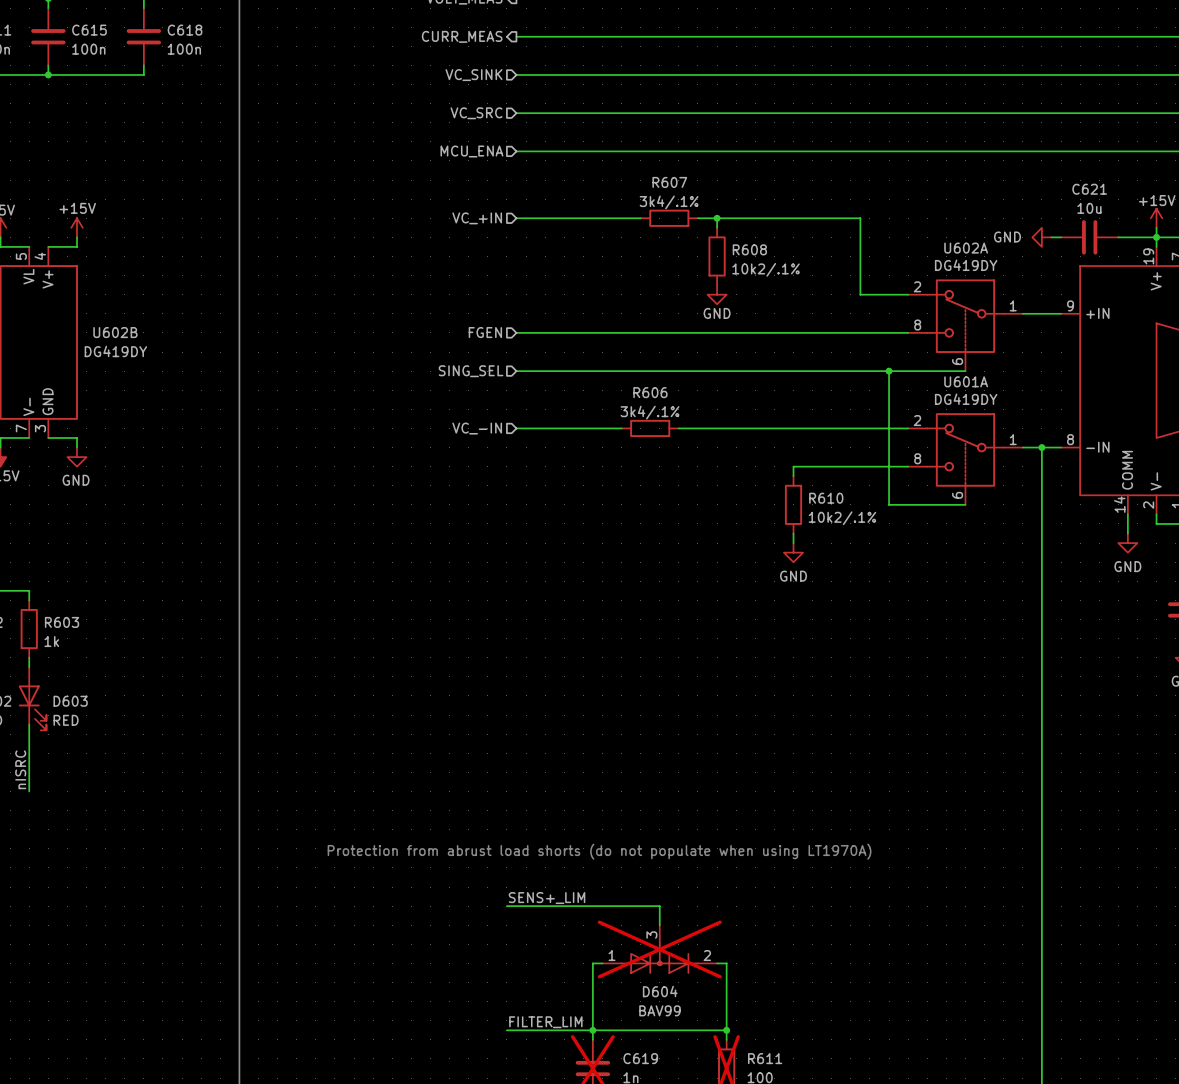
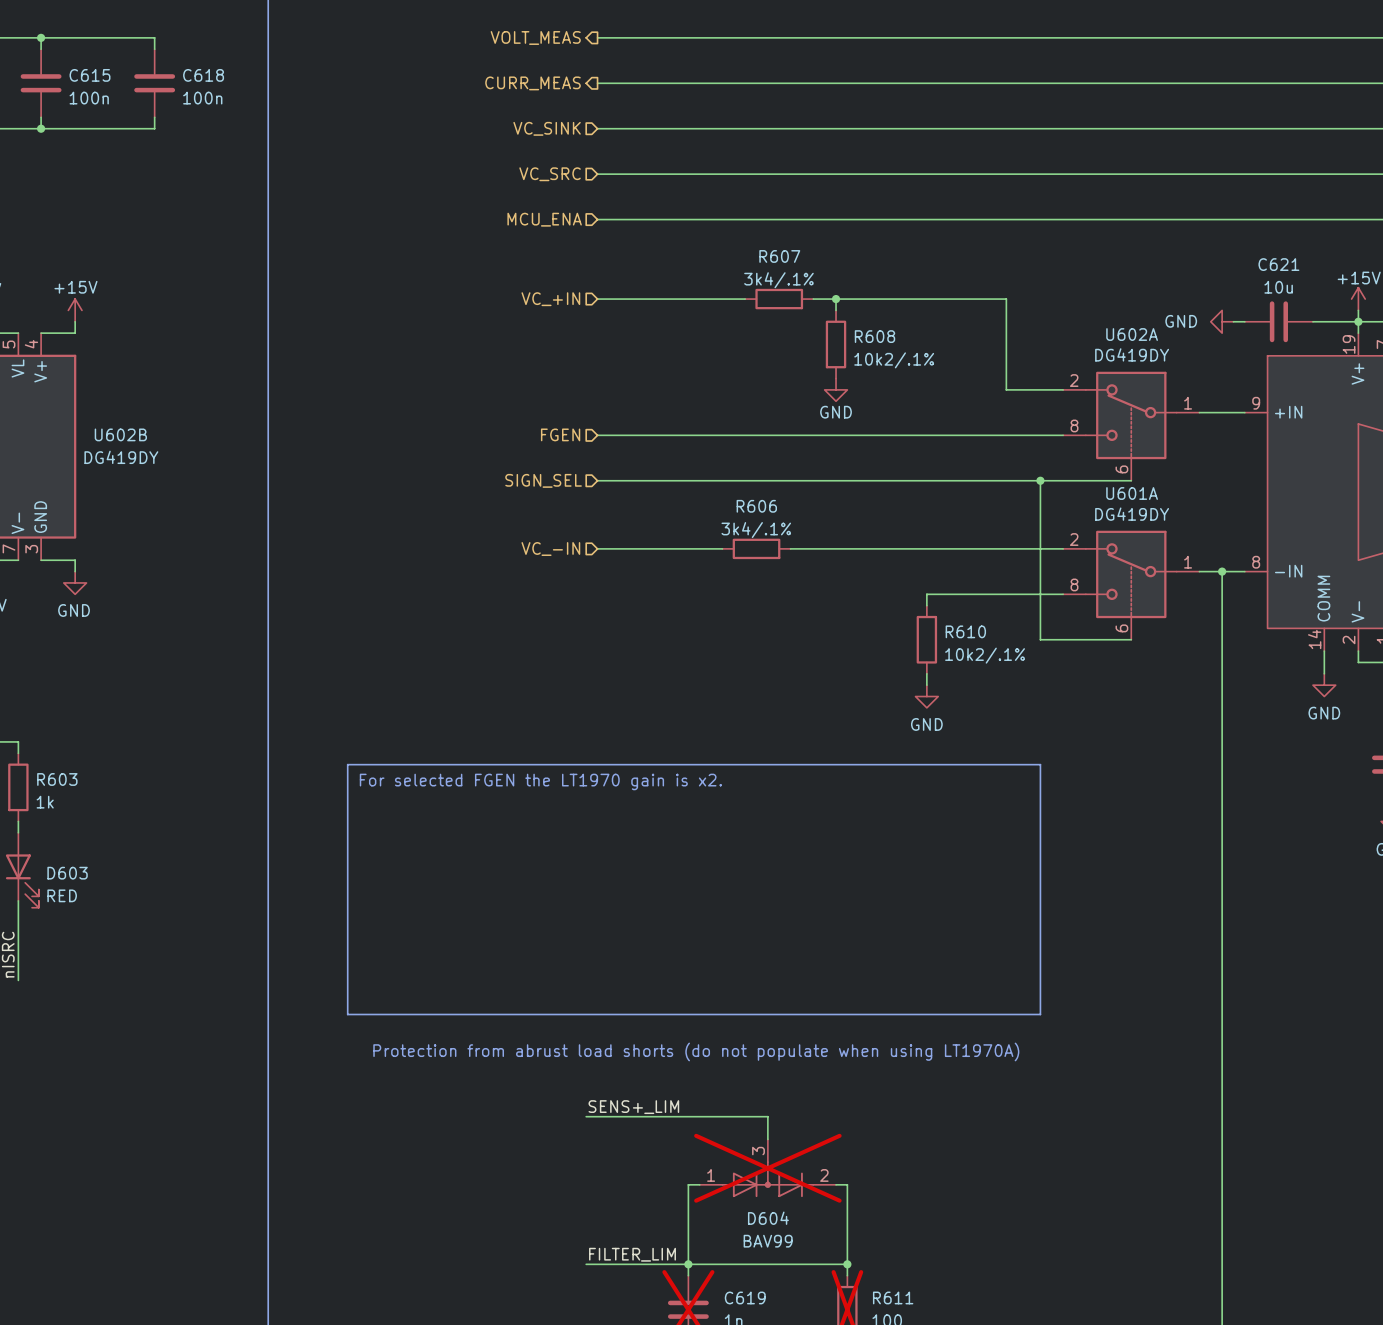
hierarchical label: SING_SEL (471, 371) -> SIGN_SEL (543, 480)
line: none -> (347, 764) (1040, 764) (1040, 1014) (347, 1014) (347, 764)
text: none -> For selected FGEN the LT1970 gain is x2. (540, 781)

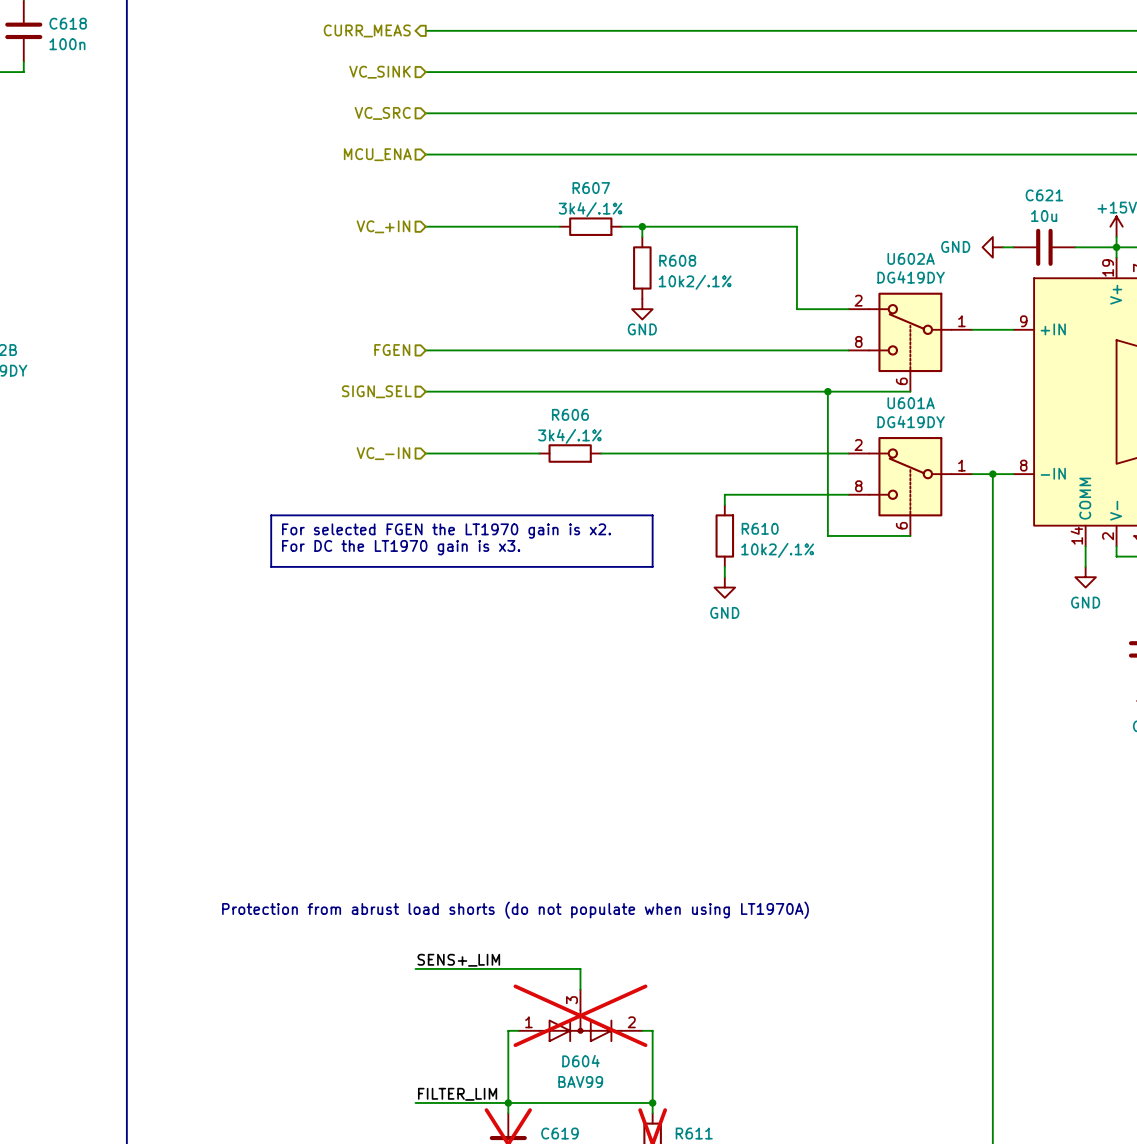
line: none -> (271, 515) (652, 515) (652, 566) (271, 566) (271, 515)
text: none -> For DC the LT1970 gain is x3. (401, 547)
line: (347, 764) (1040, 764) (1040, 1014) (347, 1014) (347, 764) -> none
text position: For selected FGEN the LT1970 gain is x2. (540, 781) -> For selected FGEN the LT1970 gain is x2. (446, 531)

